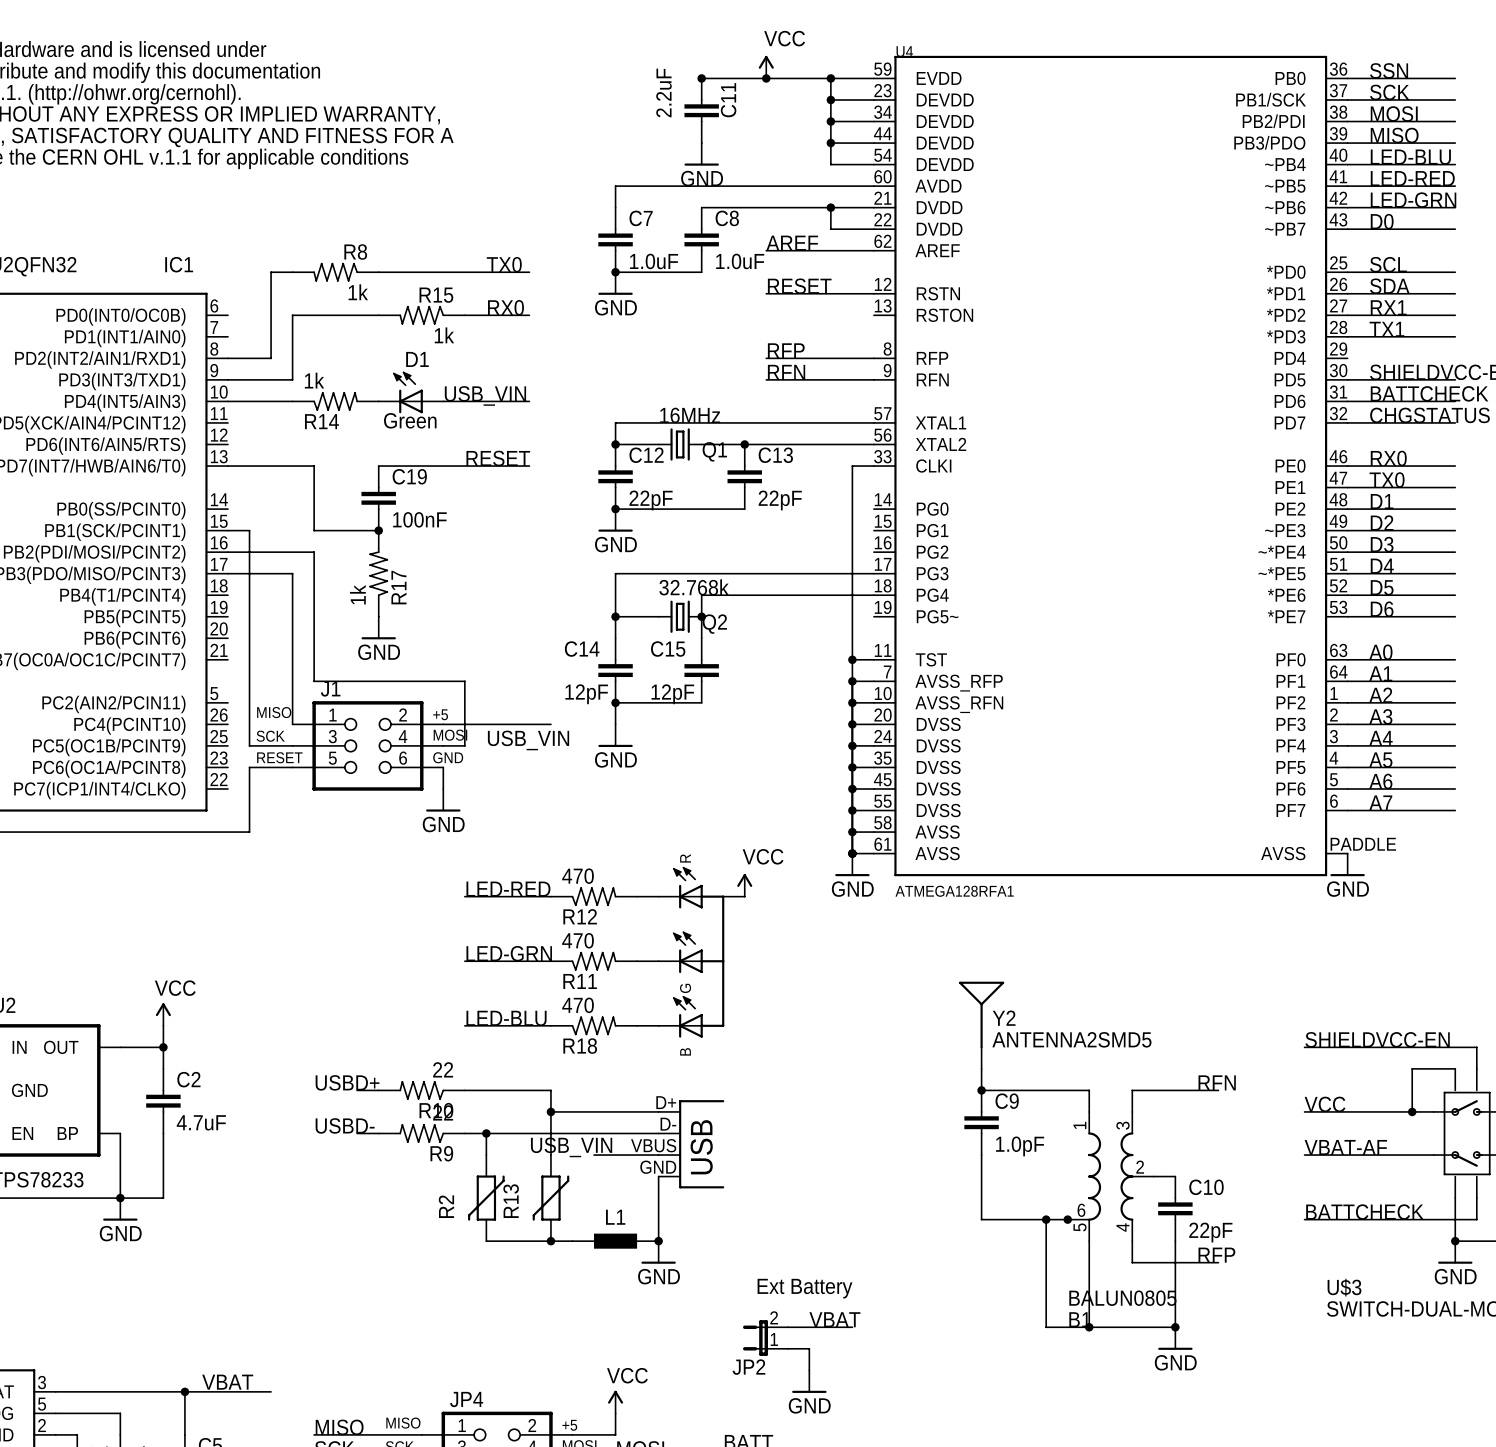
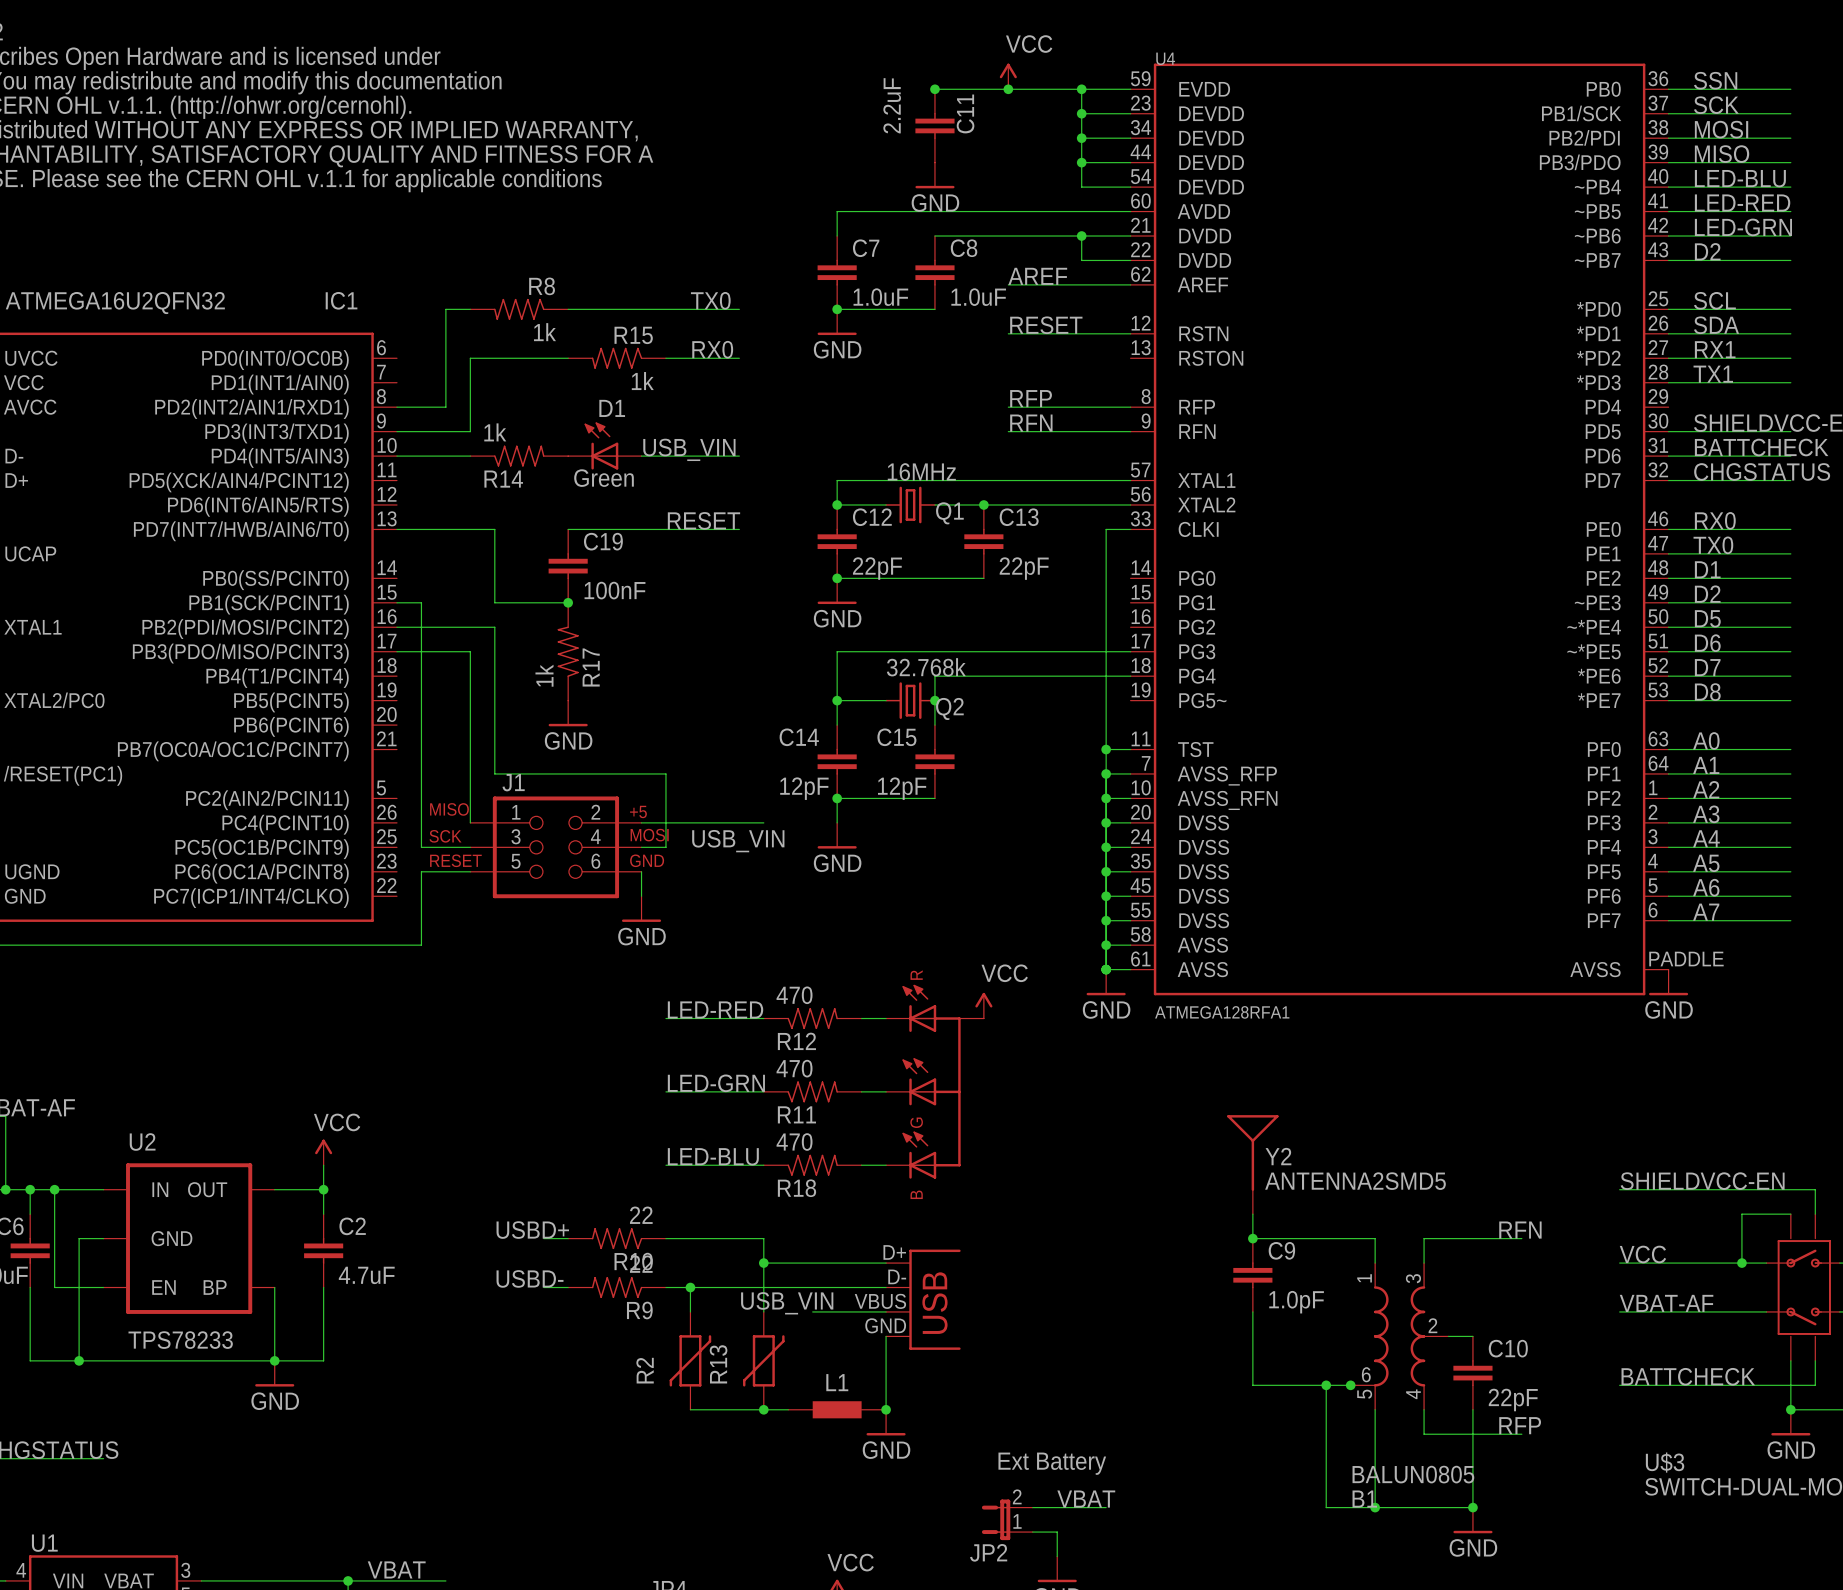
label: D0 (1382, 221) -> D2 (1707, 251)
label: D3 (1382, 544) -> D5 (1707, 618)
label: D4 (1382, 566) -> D6 (1707, 643)
label: D5 (1382, 587) -> D7 (1707, 667)
label: D6 (1382, 609) -> D8 (1707, 692)

